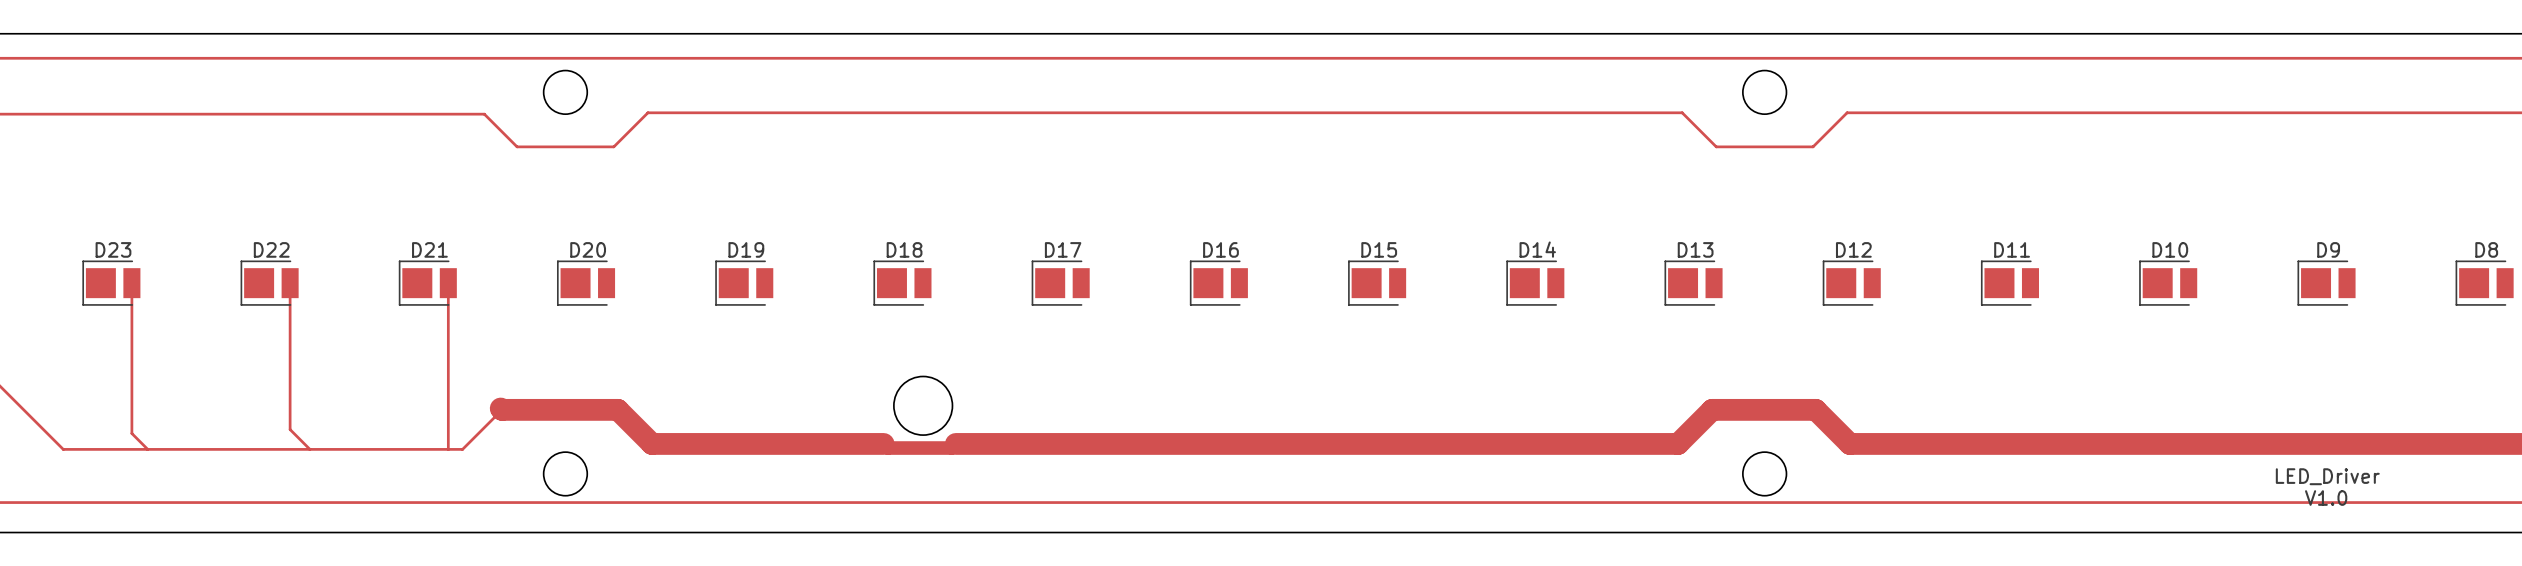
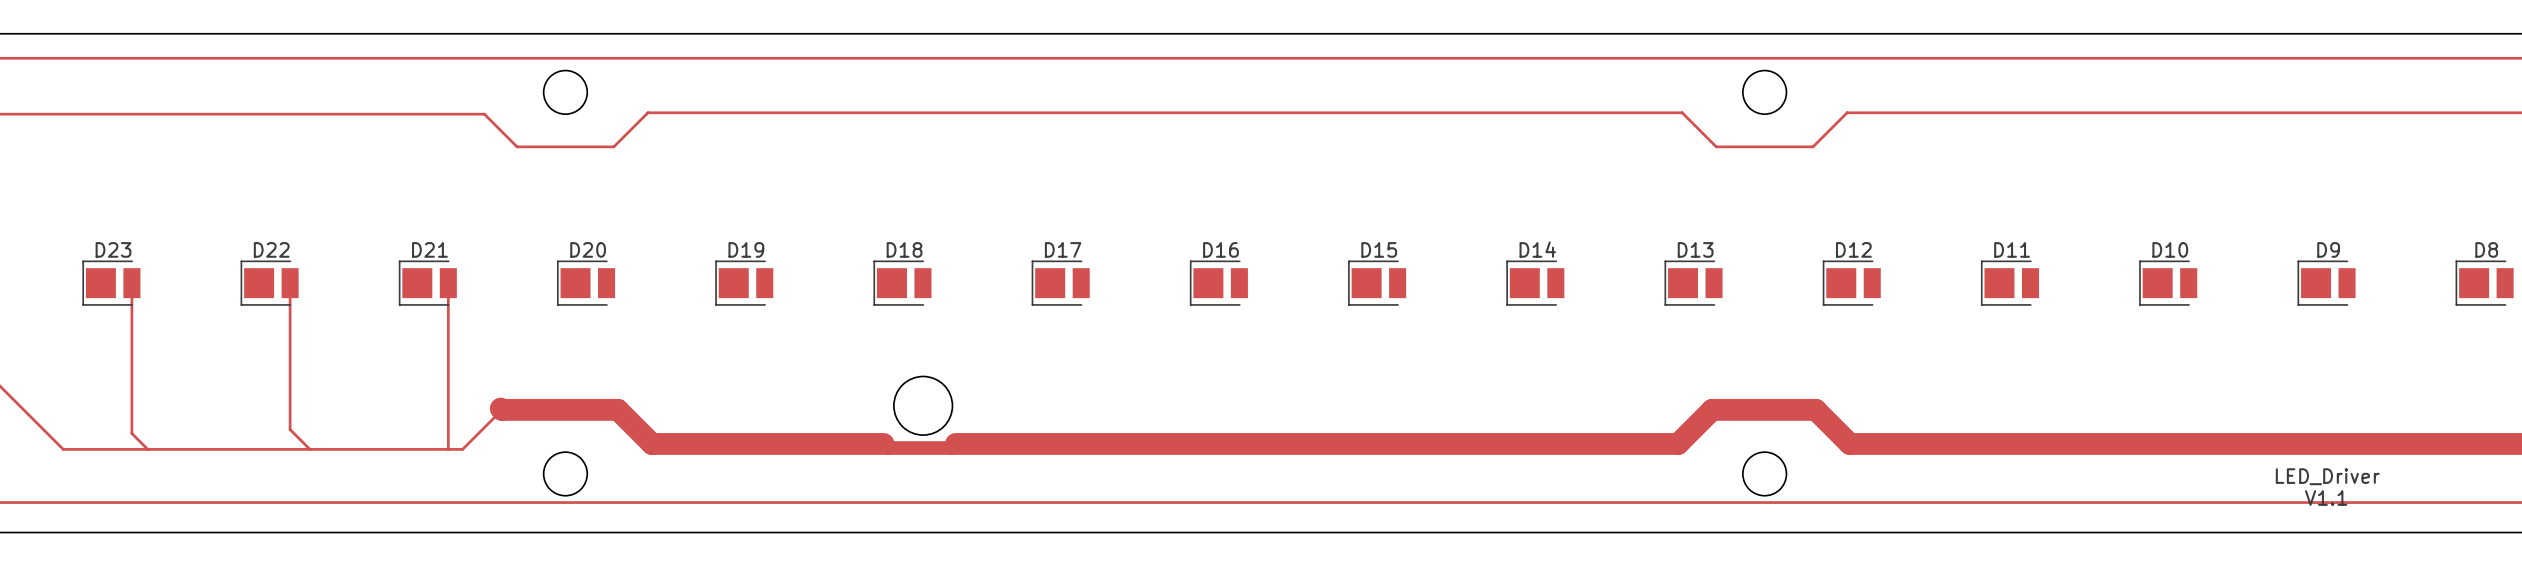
text: V1.0 (2326, 498) -> V1.1 (2326, 498)

